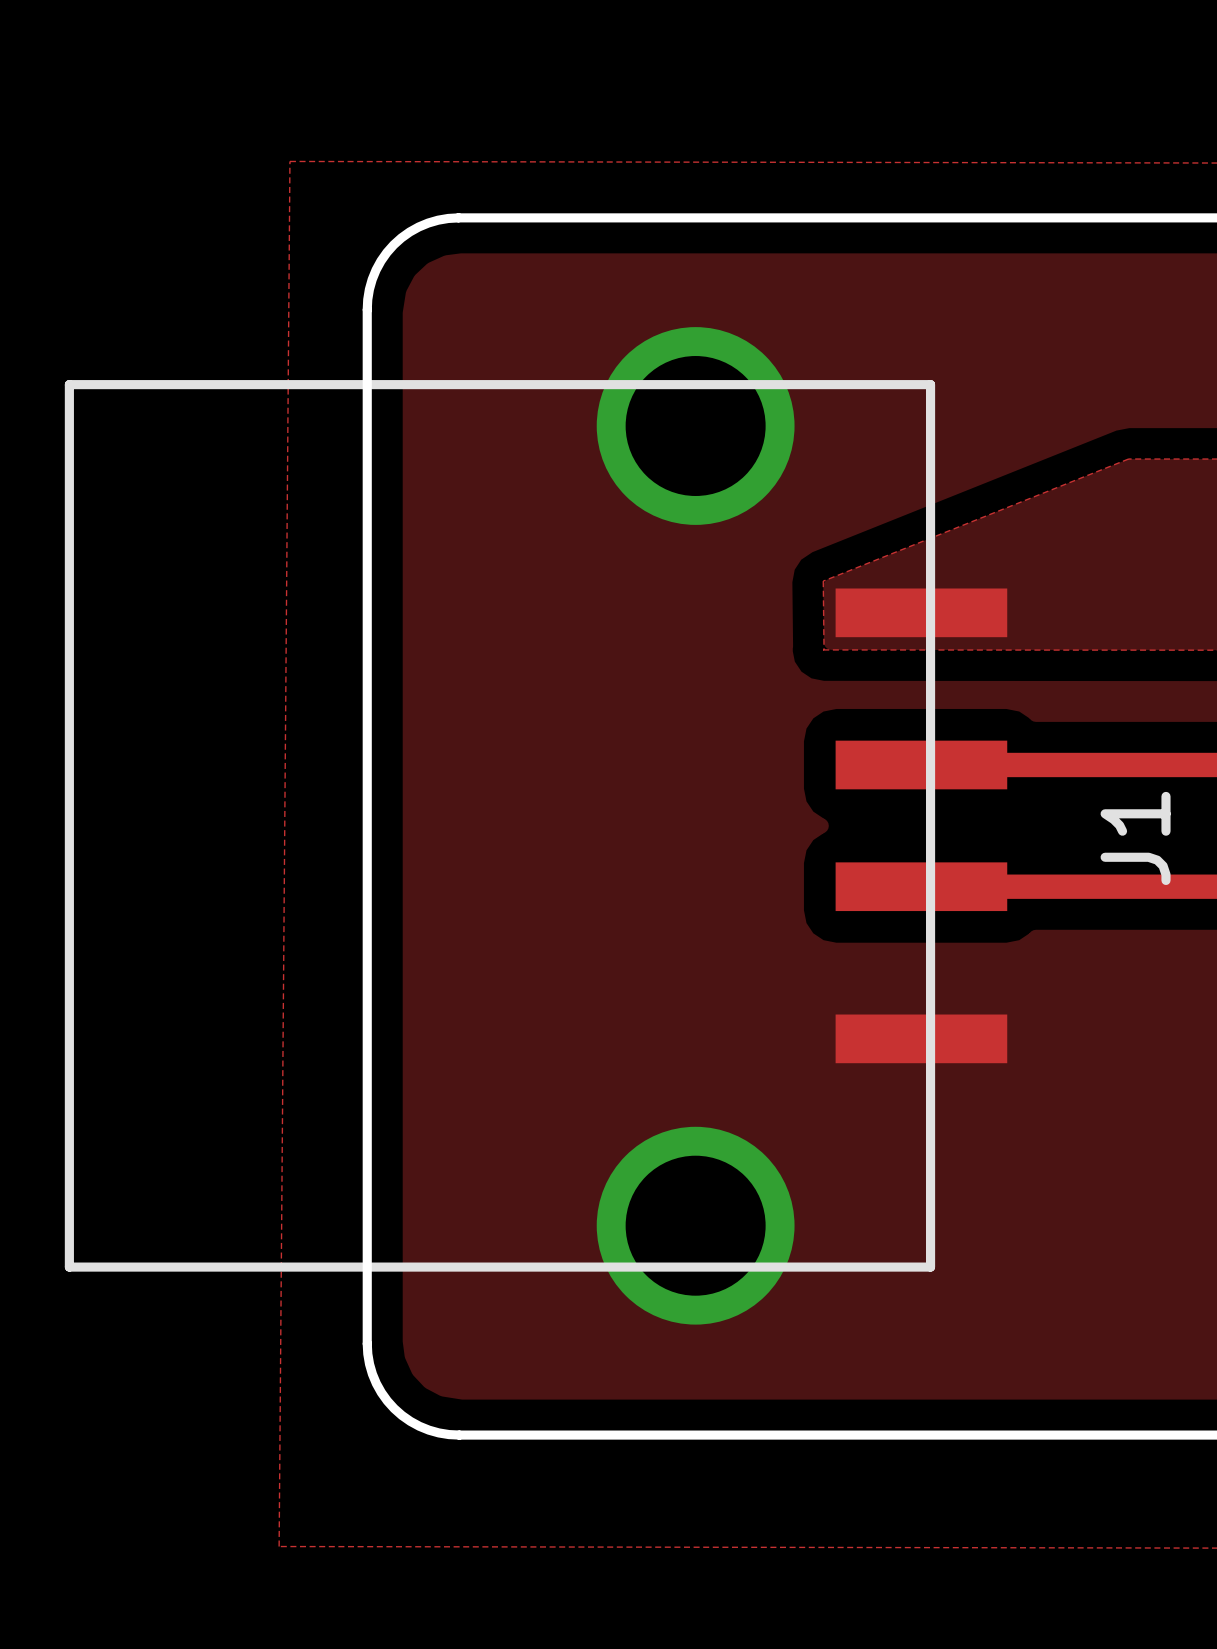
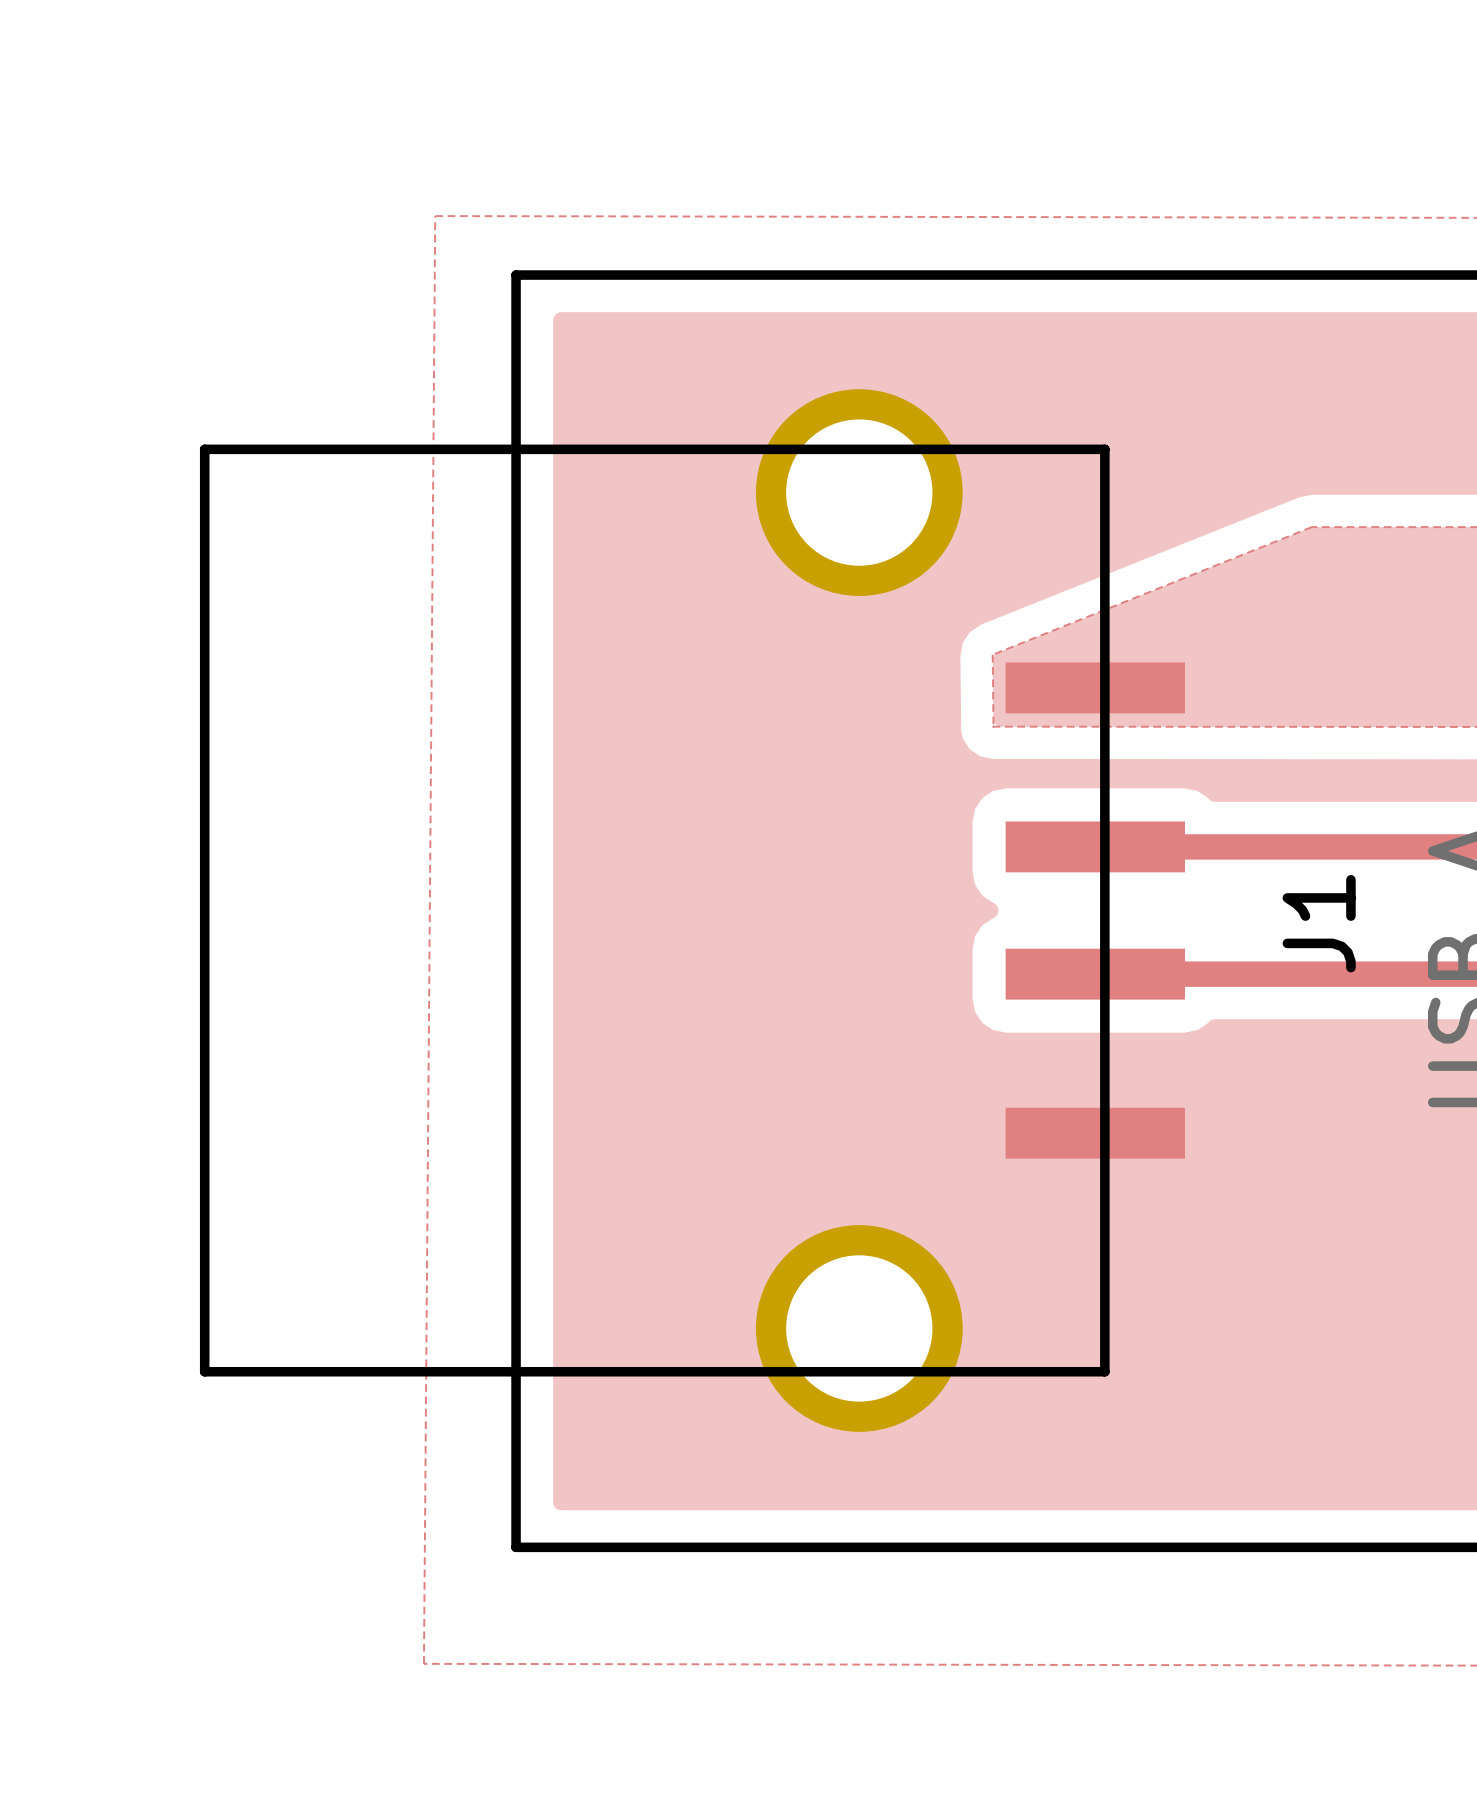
board edge: (458, 217) (428, 223) (409, 232) (393, 244) (376, 270) (369, 289) (367, 309) -> (611, 275) (516, 275) (516, 371)
board edge: (367, 1343) (372, 1374) (381, 1392) (394, 1408) (419, 1426) (438, 1432) (459, 1435) -> (516, 1451) (516, 1547) (612, 1547)

